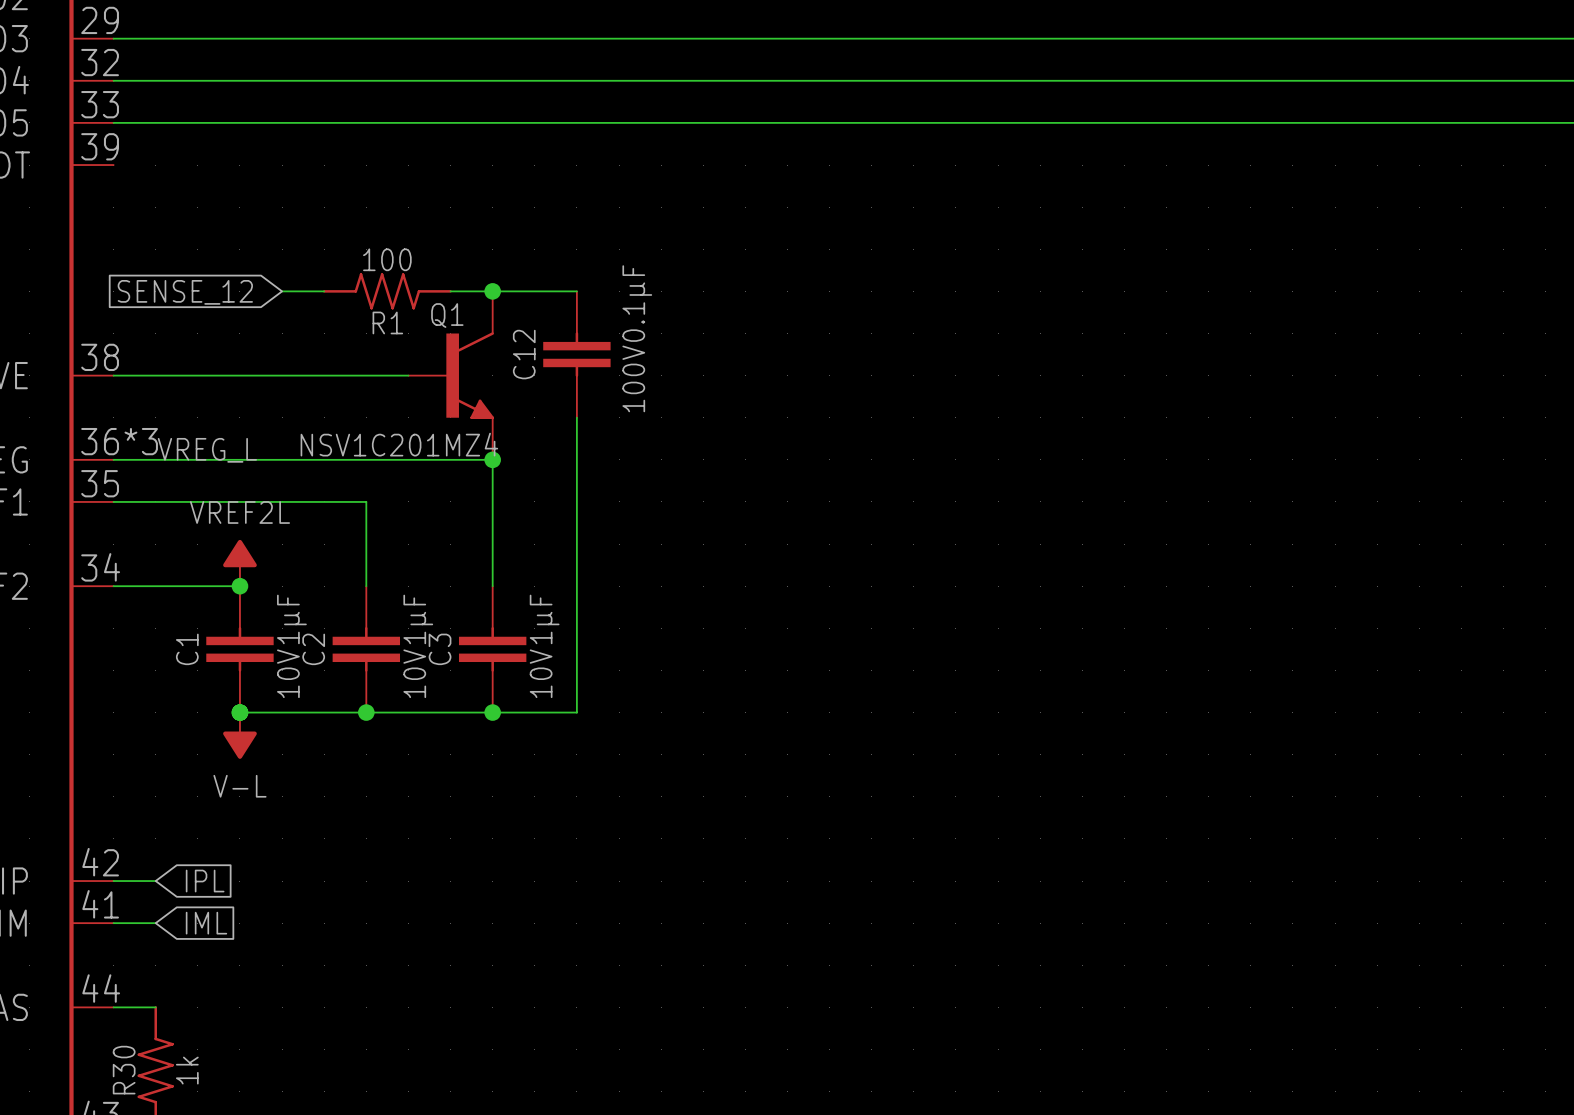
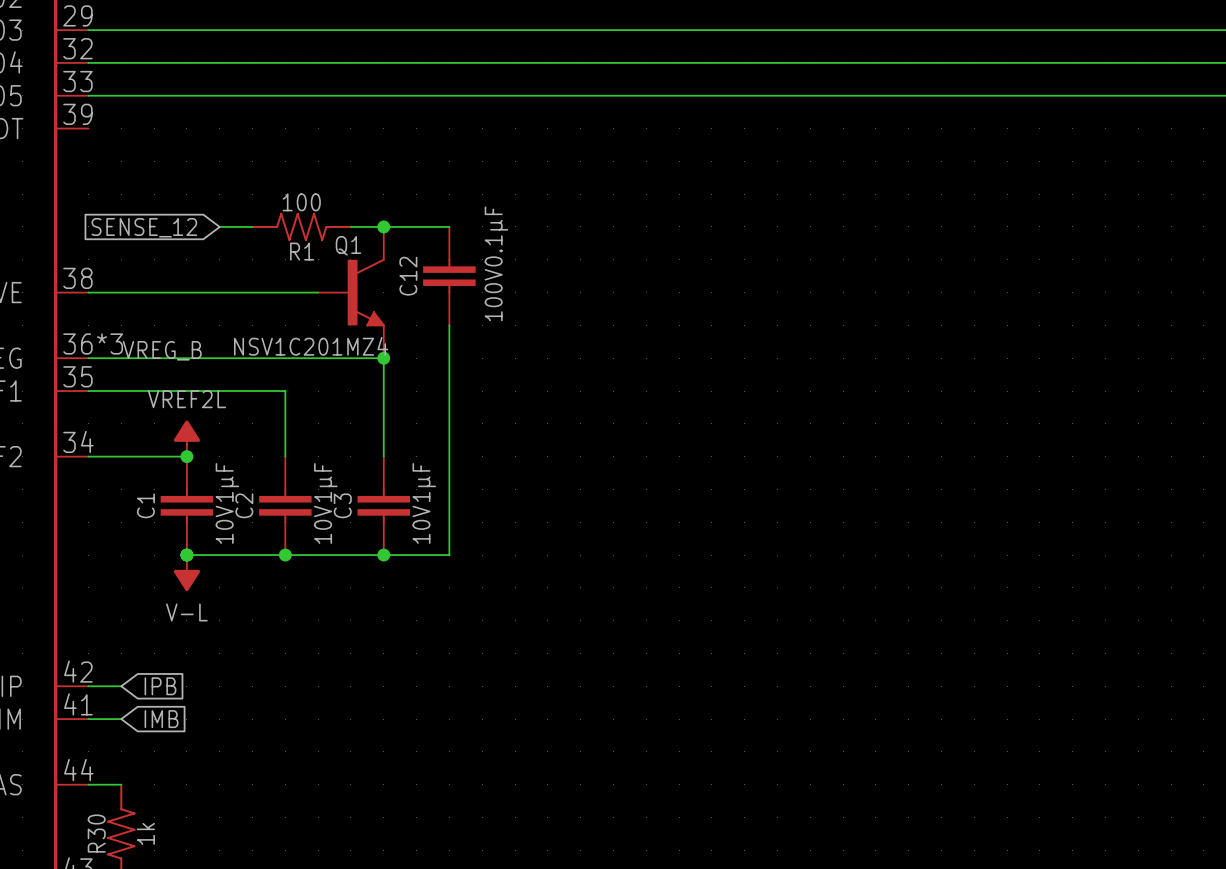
label: VREG_L (207, 450) -> VREG_B (162, 350)
global label: IPL (205, 881) -> IPB (160, 686)
global label: IML (206, 923) -> IMB (161, 719)

